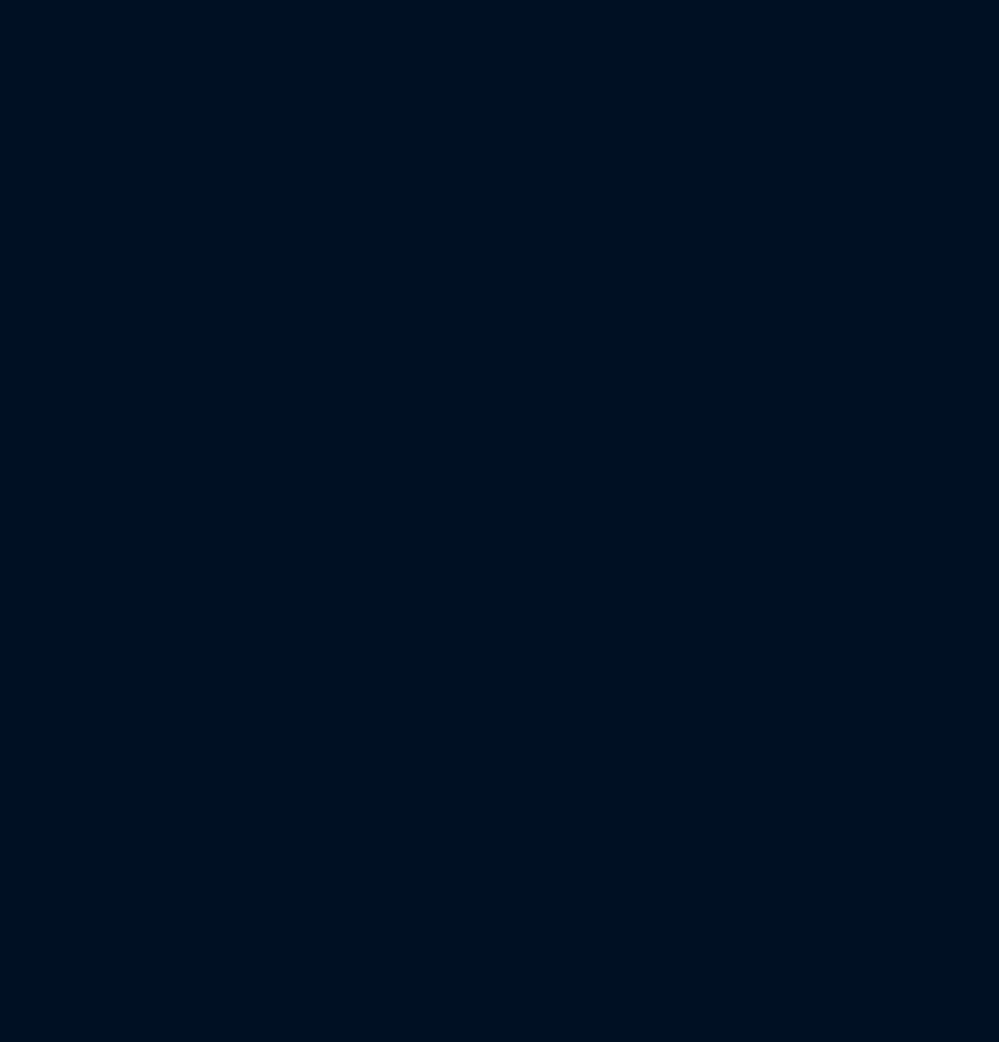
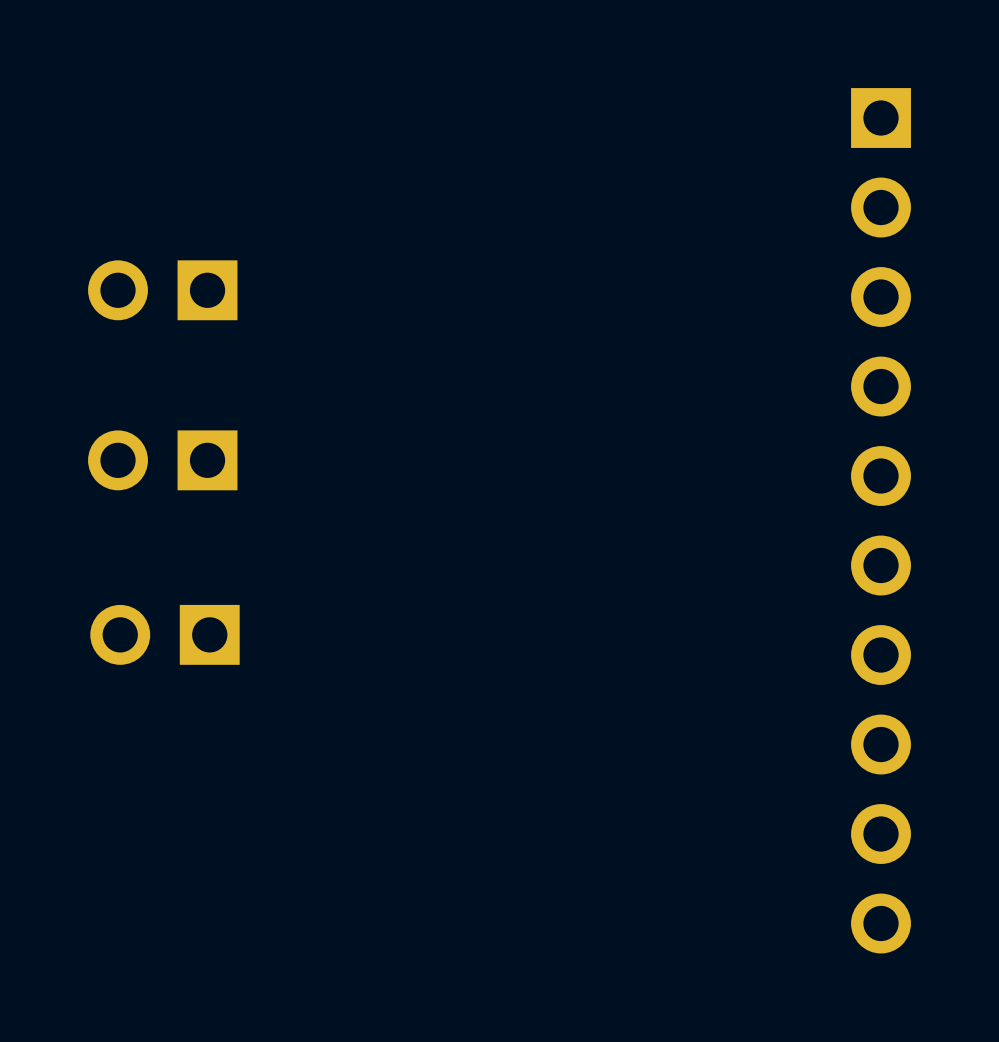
part: none -> (162, 290)
part: none -> (162, 460)
part: none -> (881, 520)
part: none -> (165, 634)

